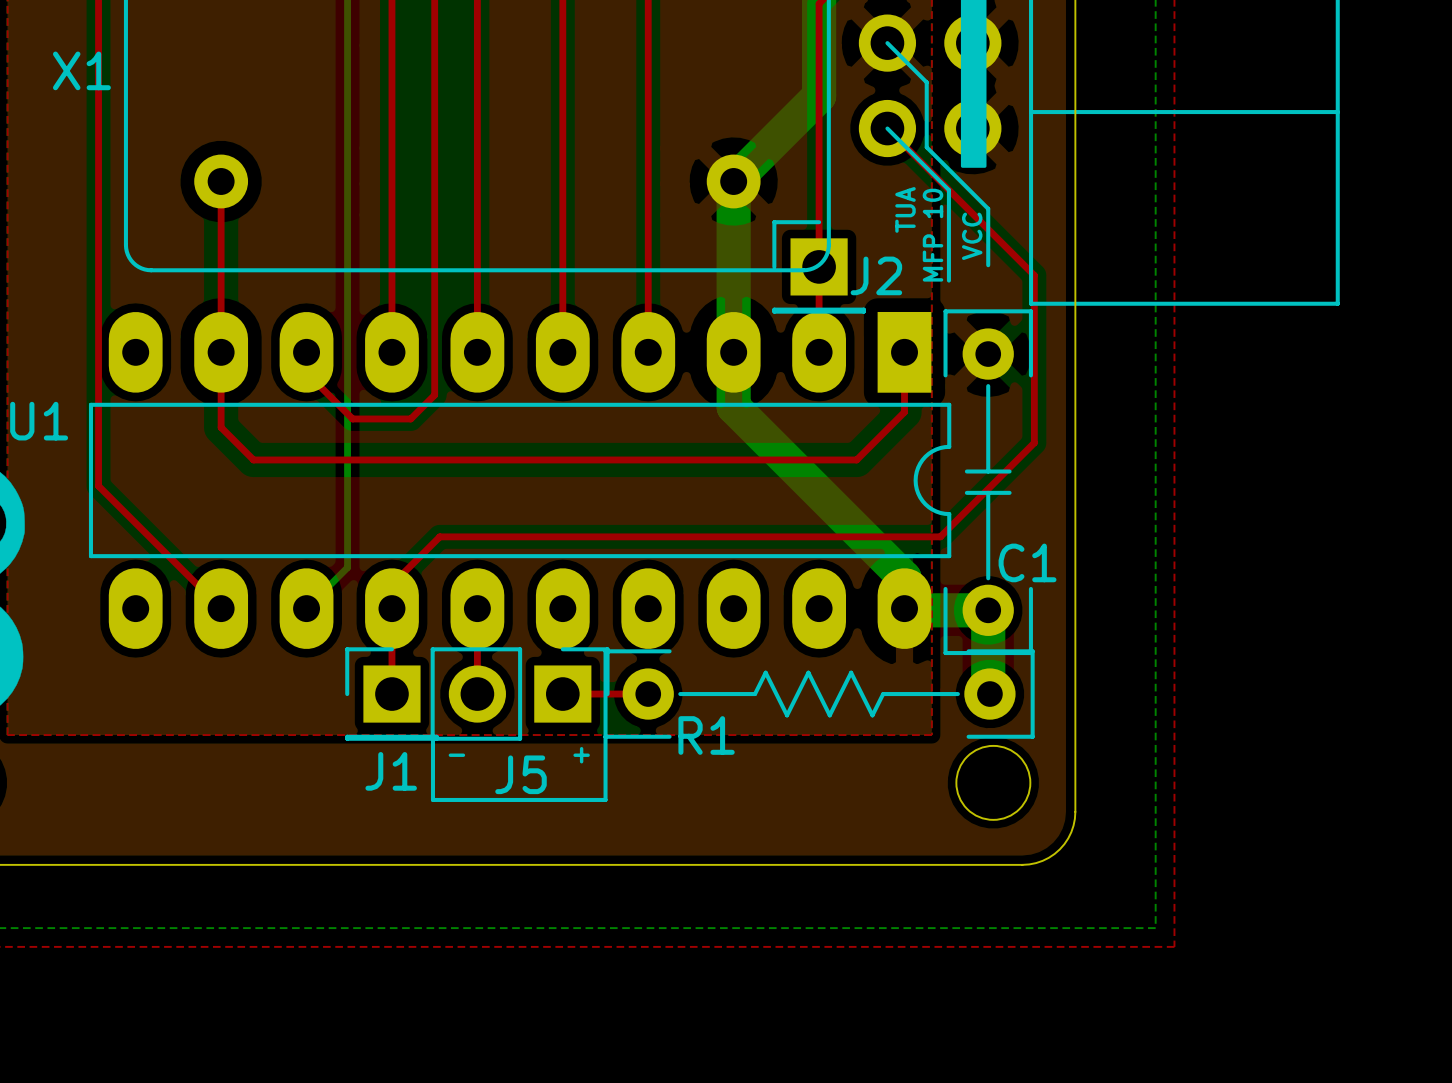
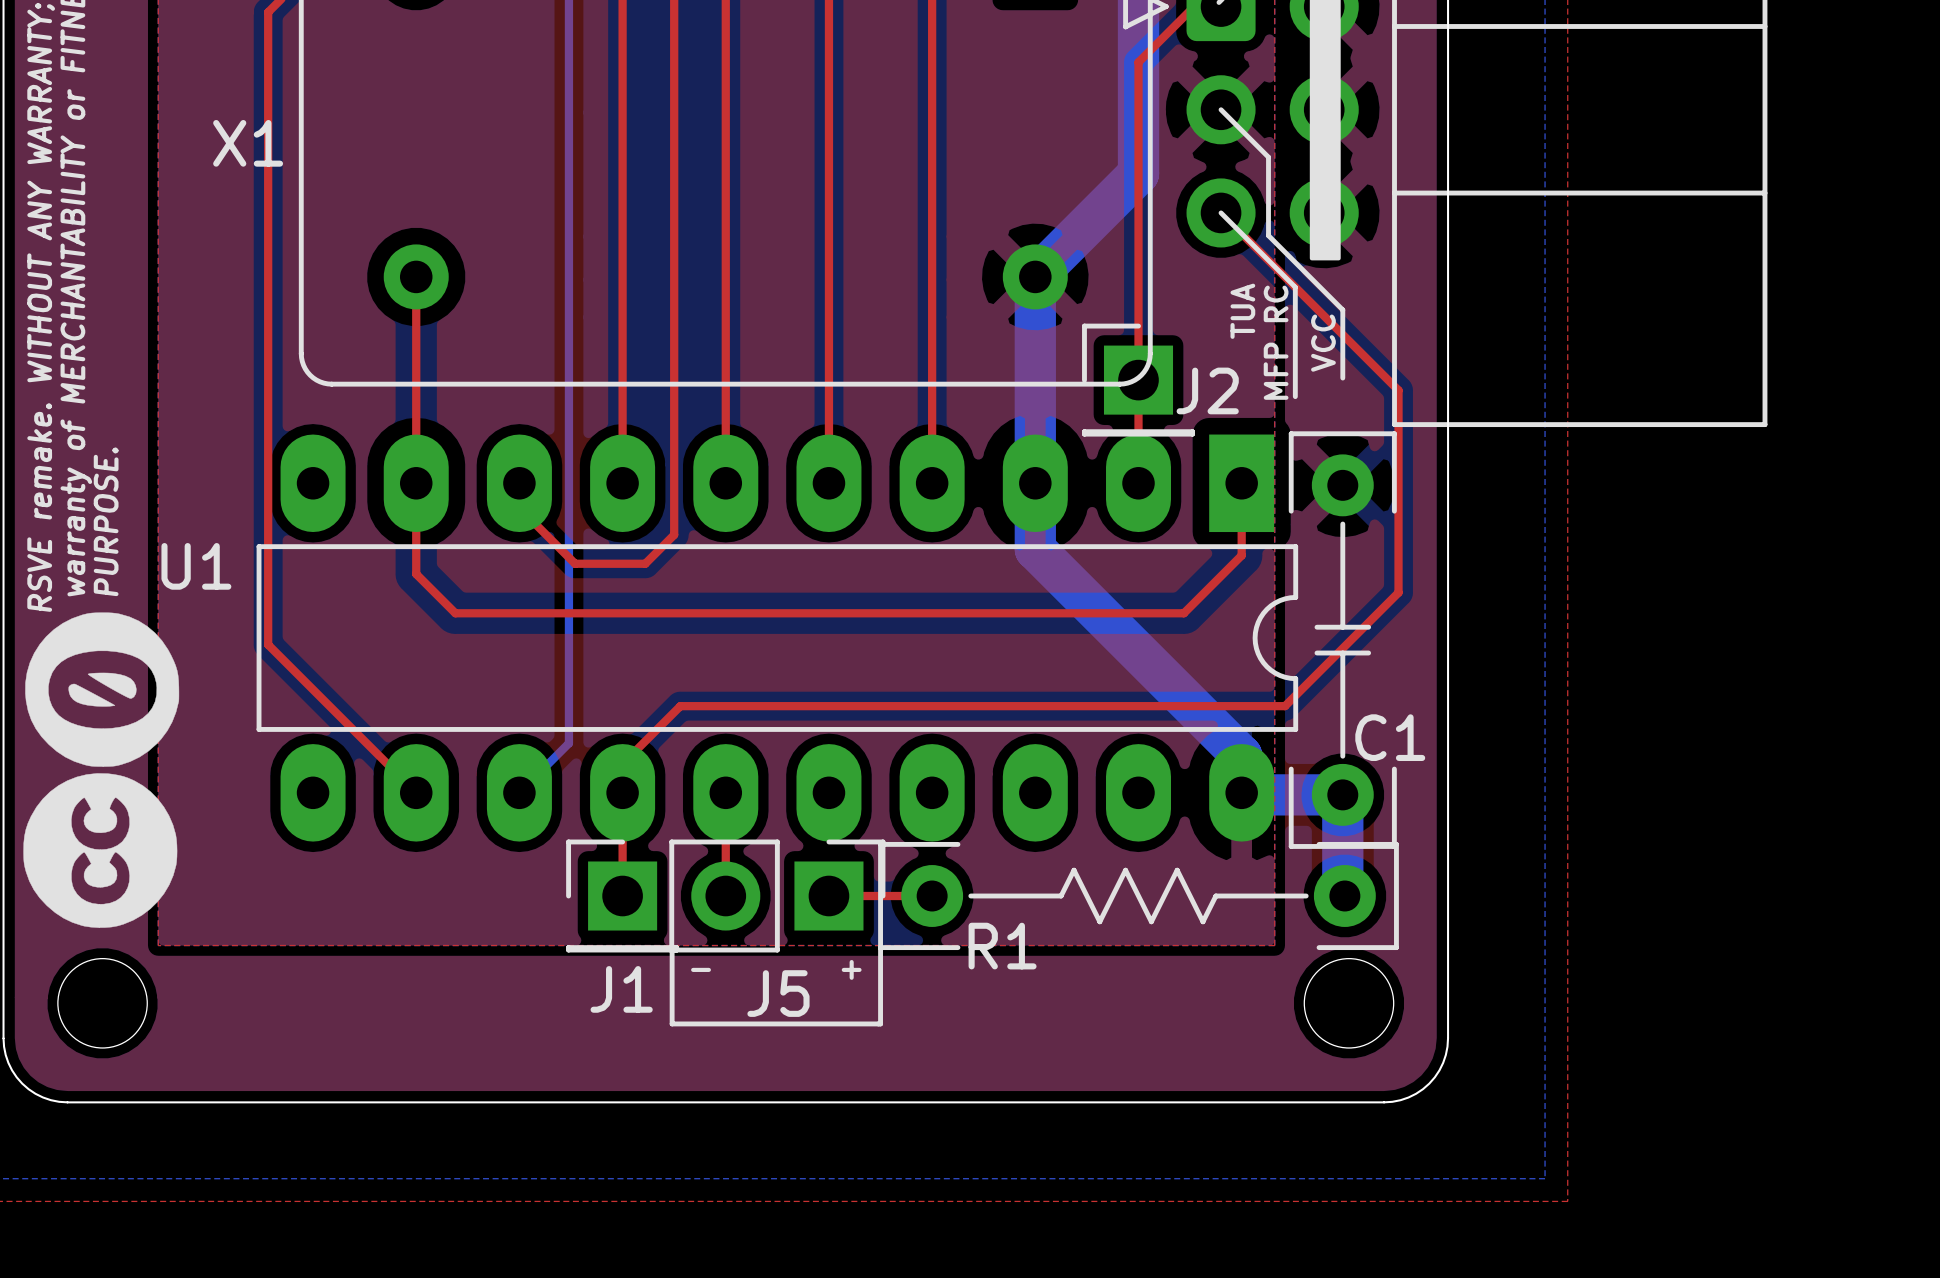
text: MFP 10 (933, 235) -> MFP RC (1276, 342)

